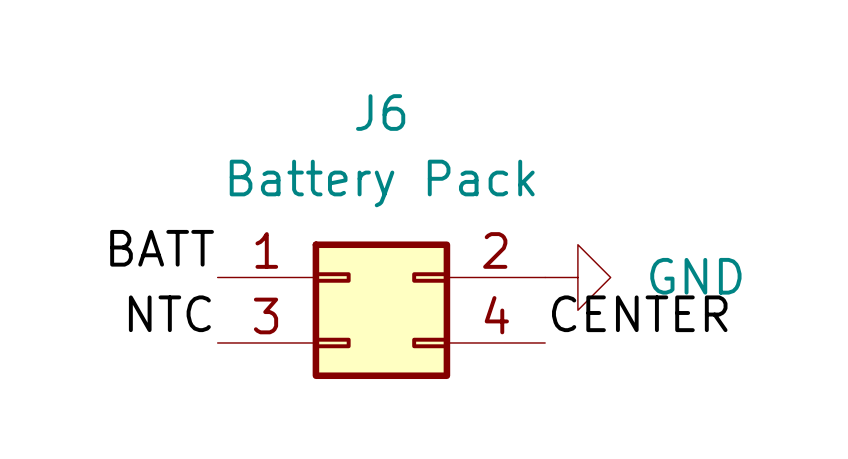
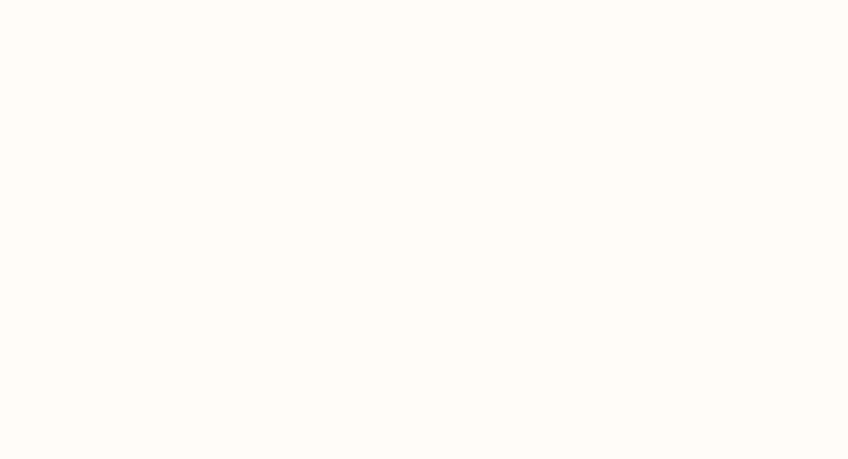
label: BATT (162, 248) -> none
power symbol: GND (577, 277) -> none
J6: Battery Pack (381, 310) -> none
label: NTC (169, 313) -> none
label: CENTER (639, 313) -> none

